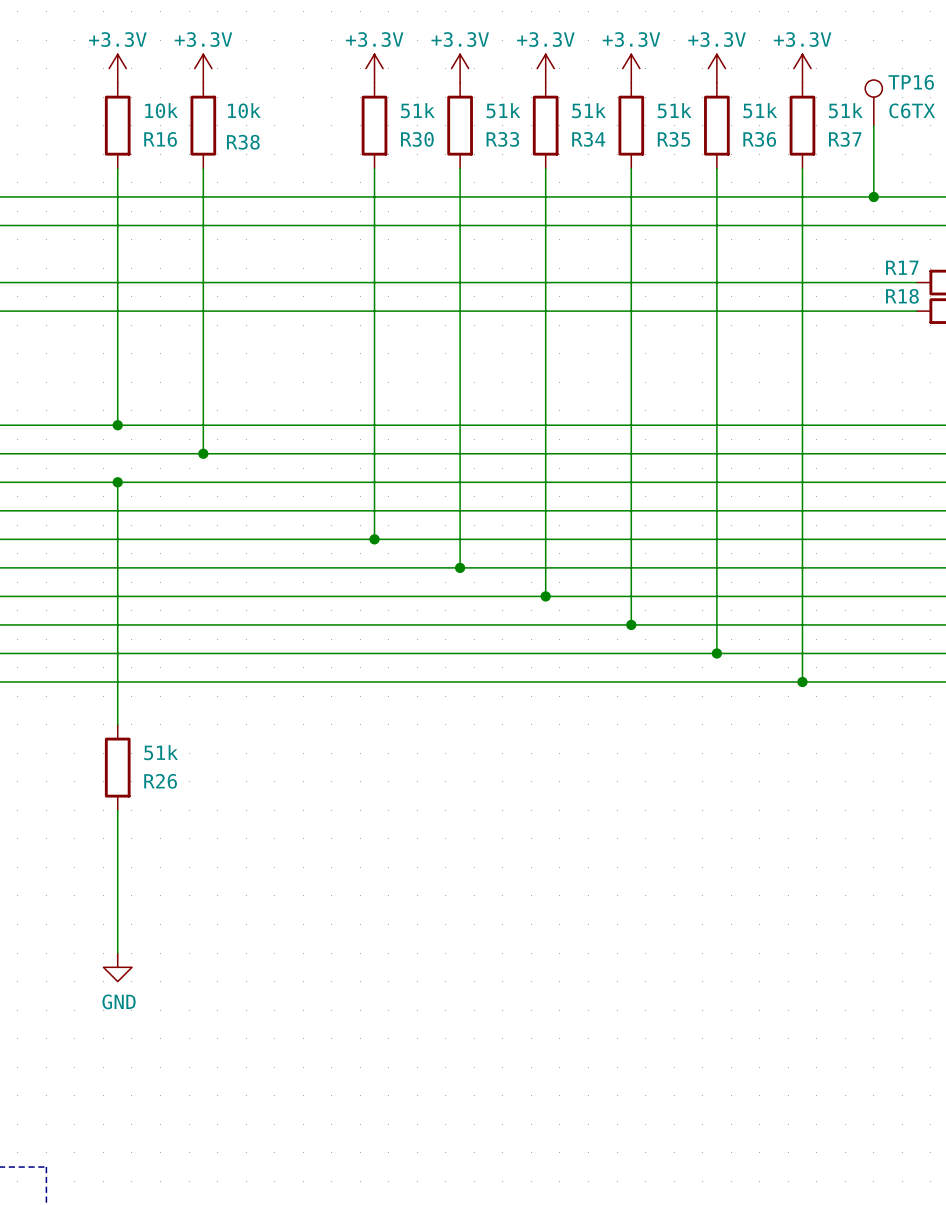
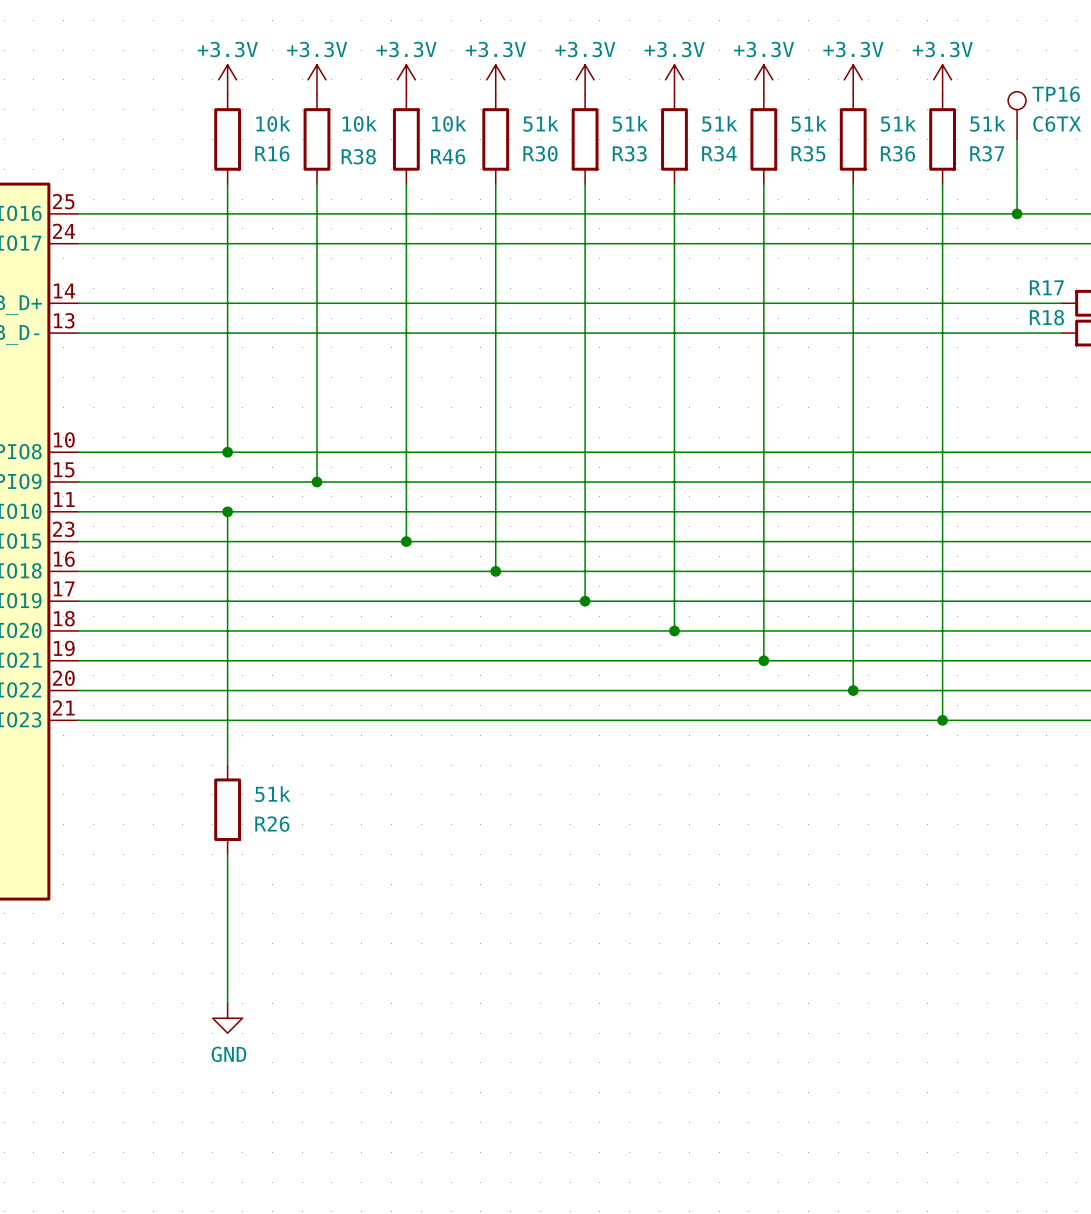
power symbol: none -> +3.3V (406, 79)
R46: none -> 10k (406, 139)
wire: none -> (406, 184) (406, 541)
junction: none -> (406, 541)

